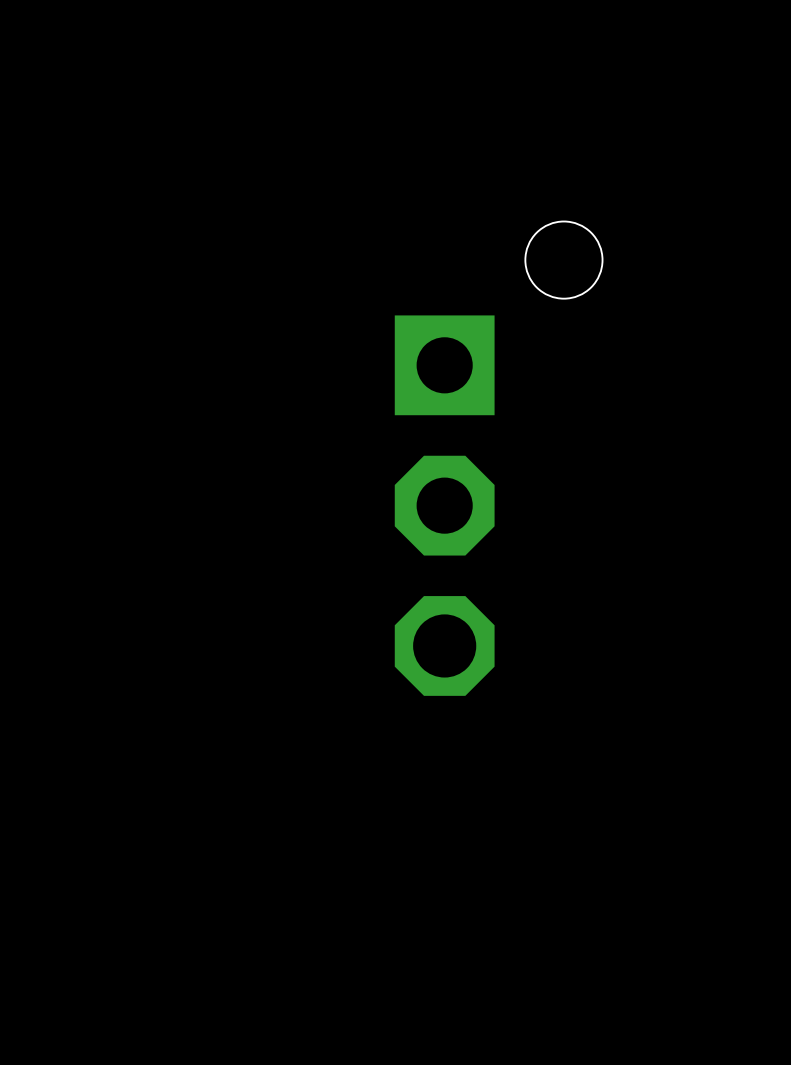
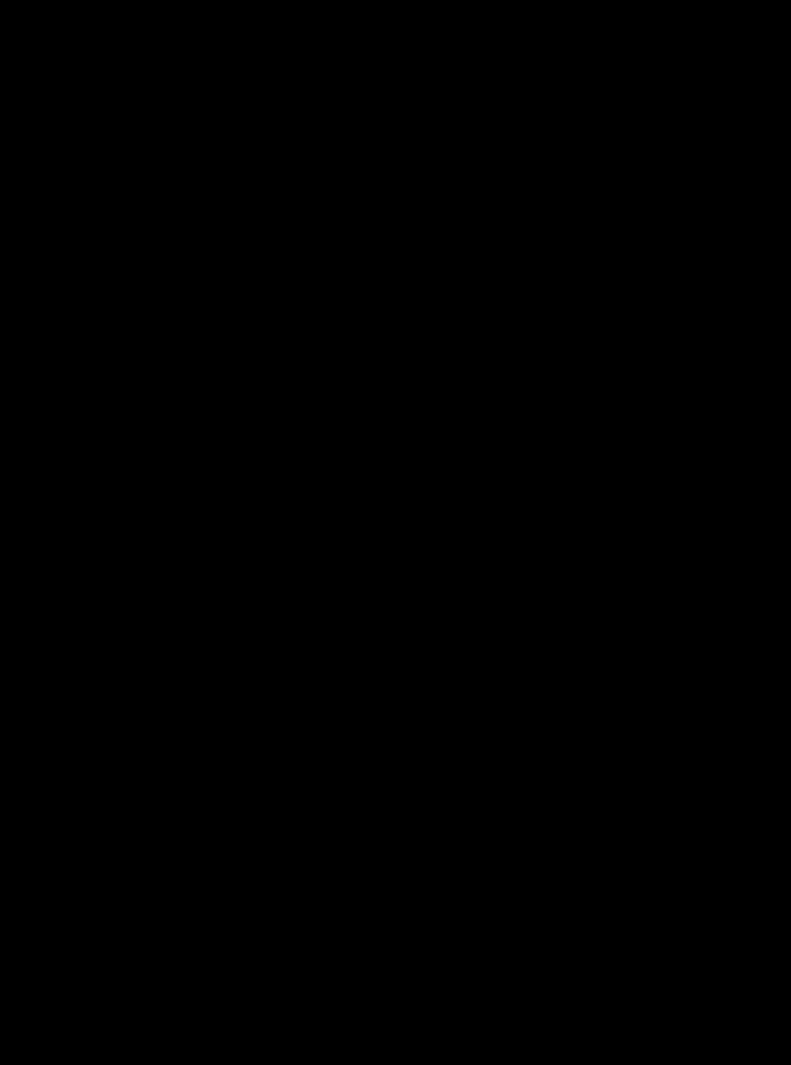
part: (498, 458) -> none

